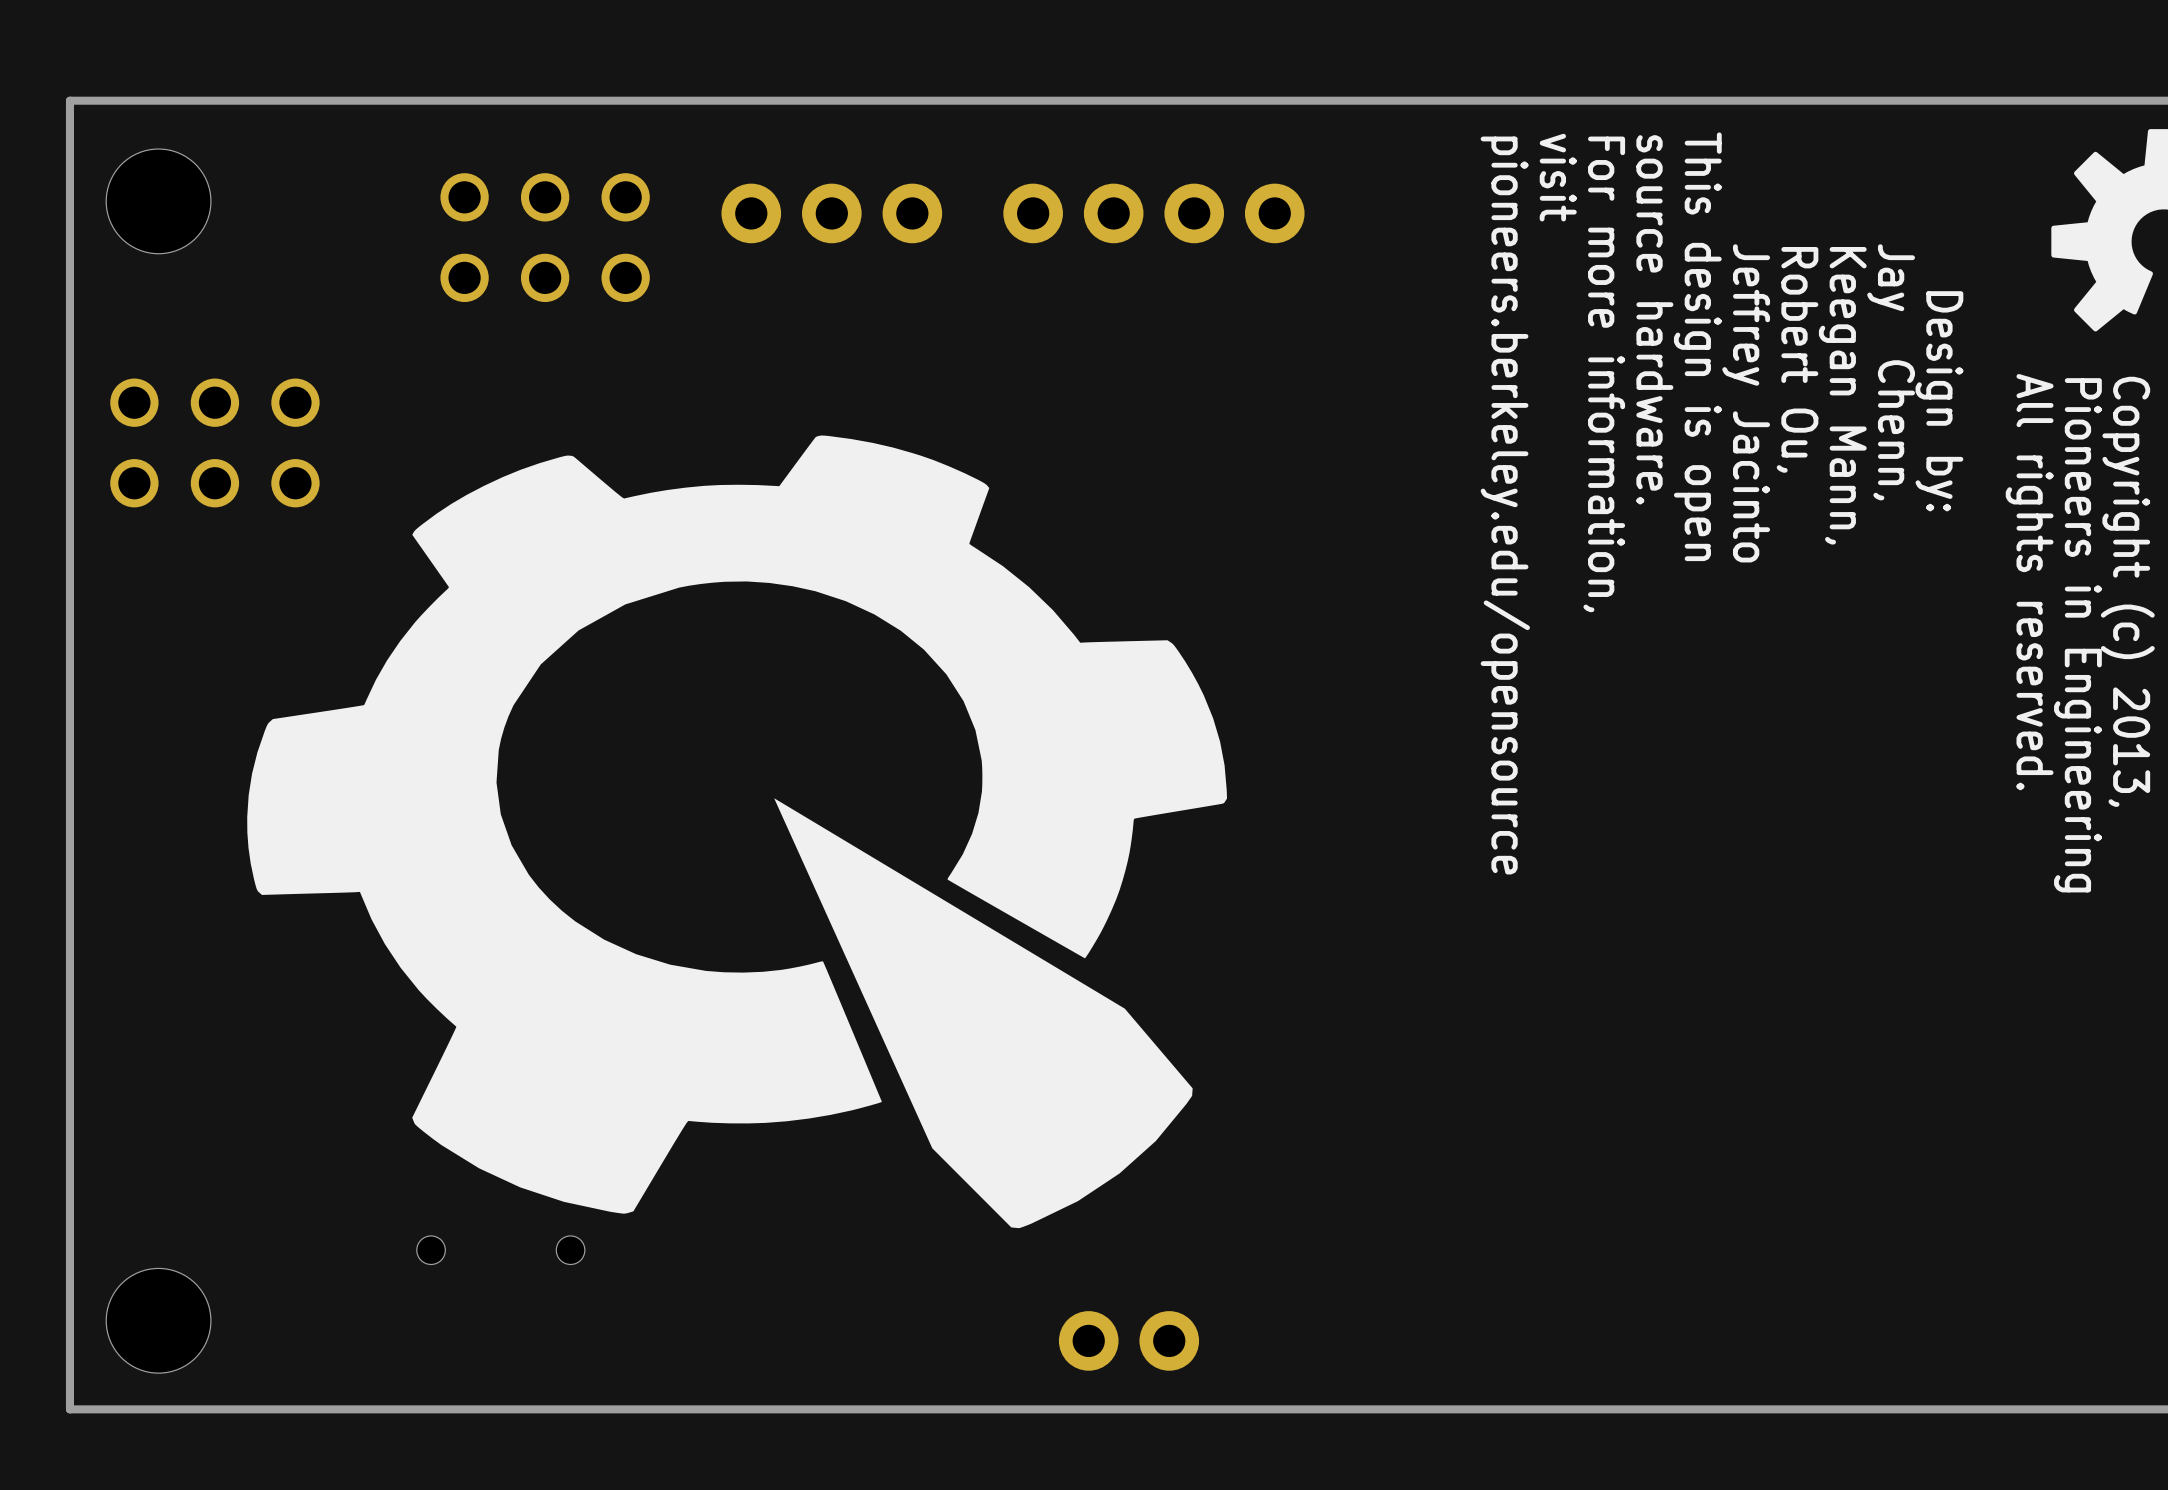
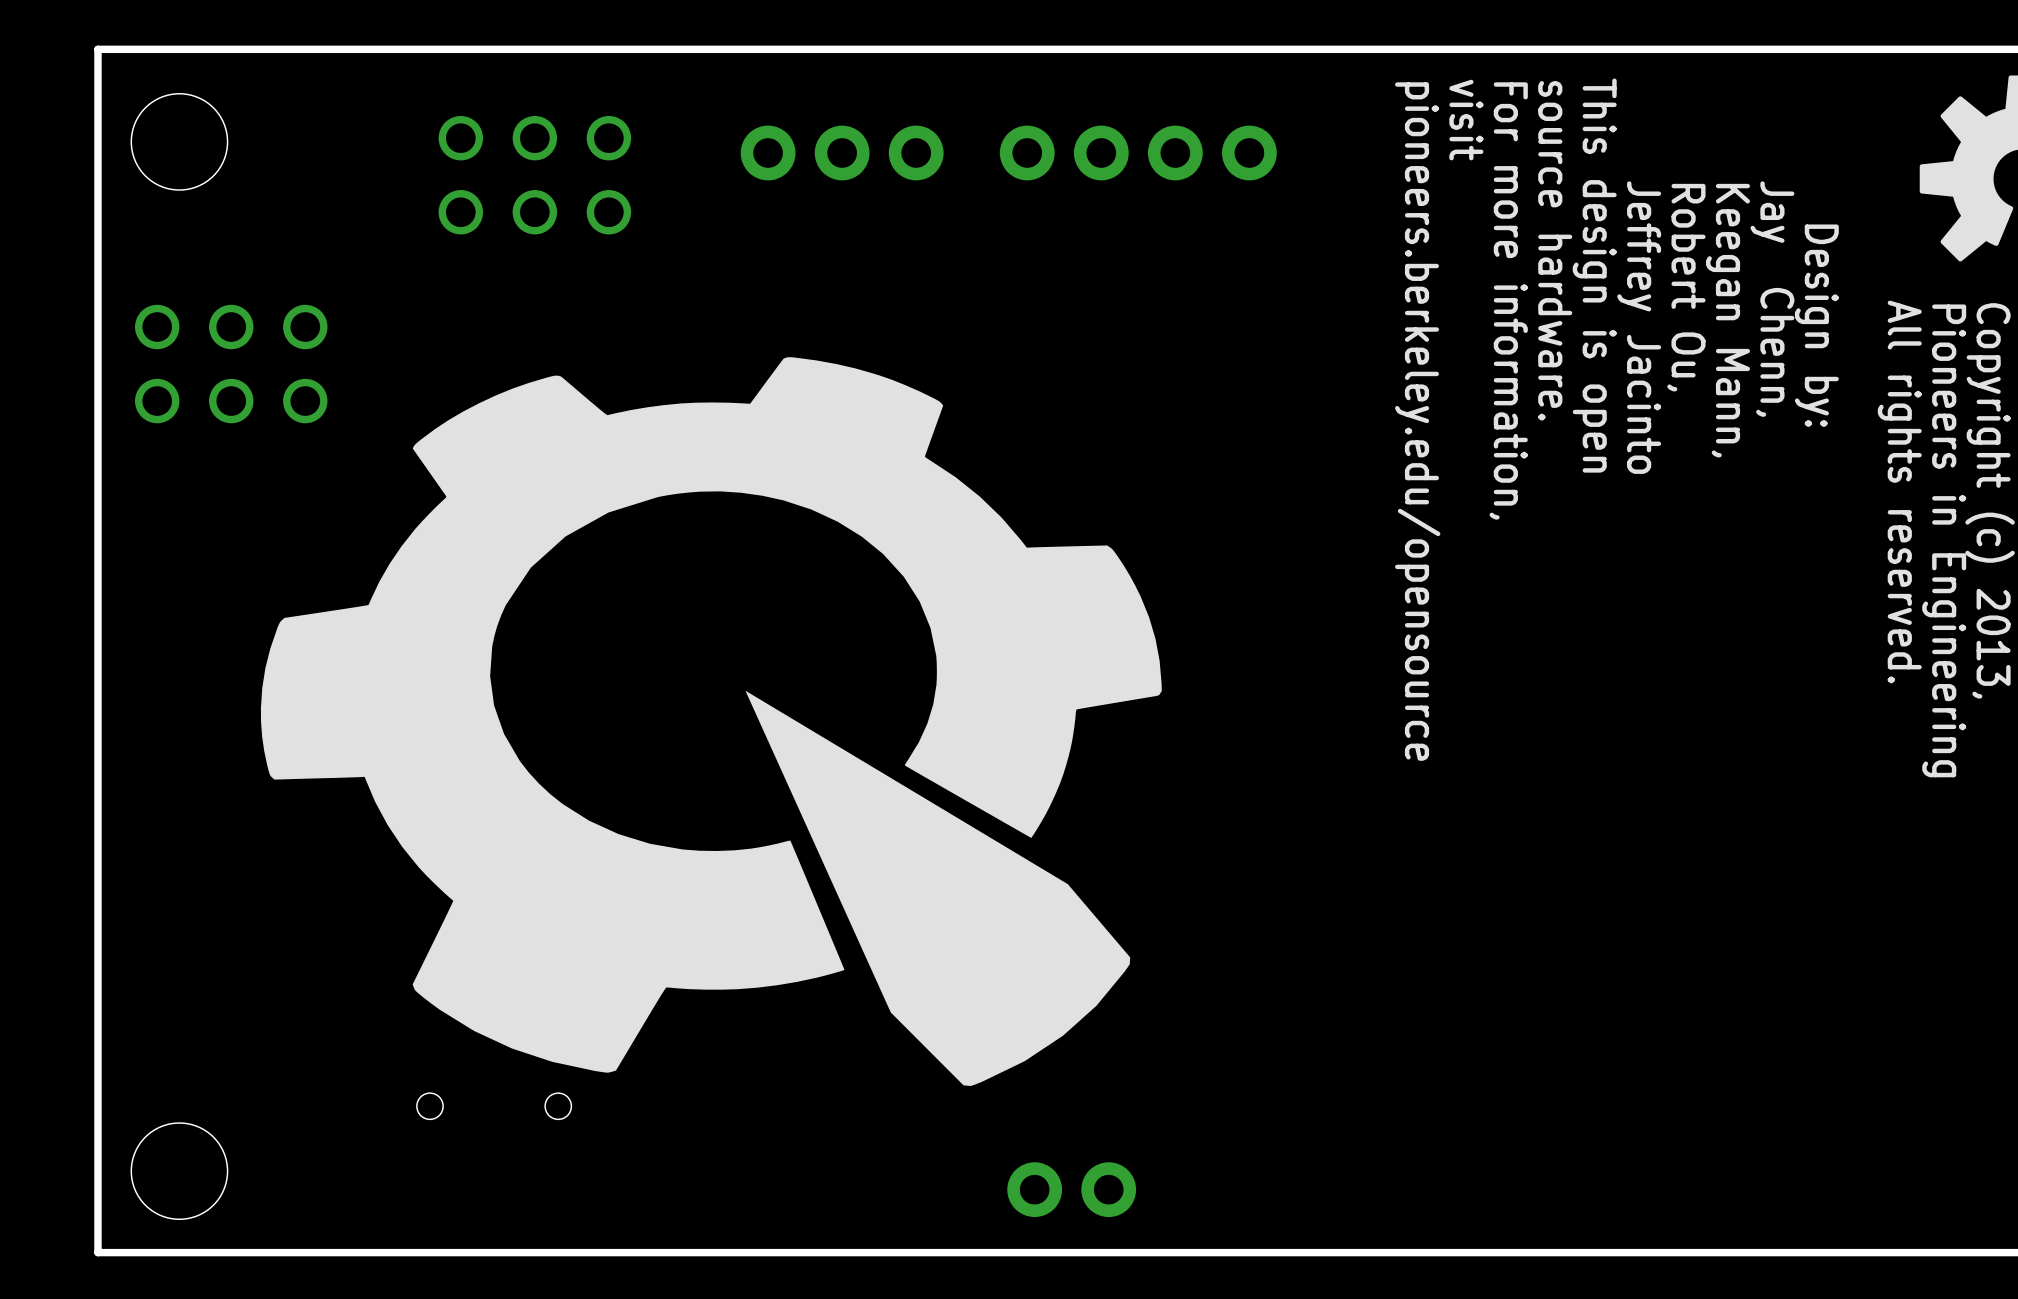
part position: (831, 213) -> (842, 153)
part position: (1153, 213) -> (1138, 153)

